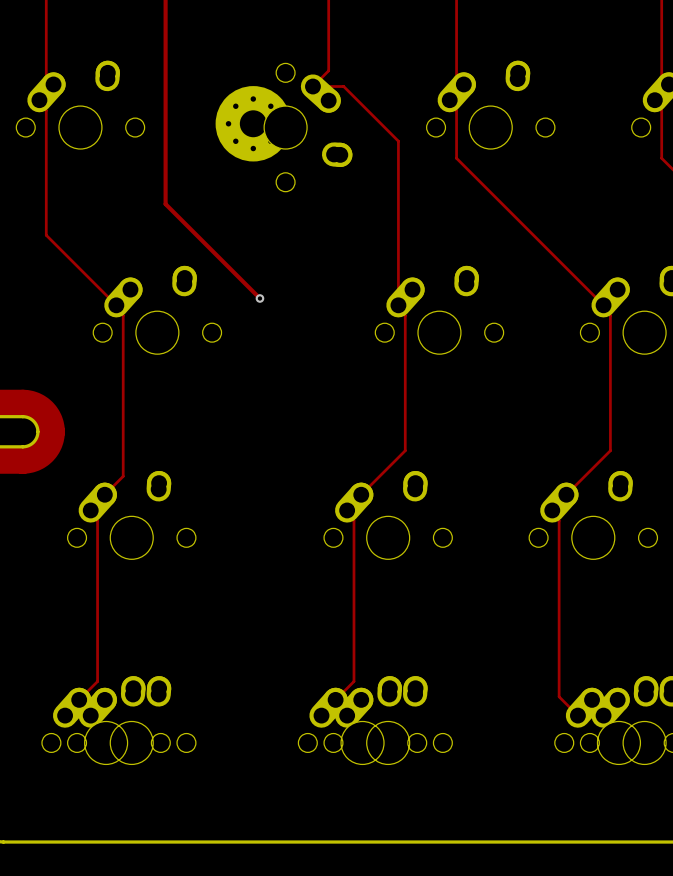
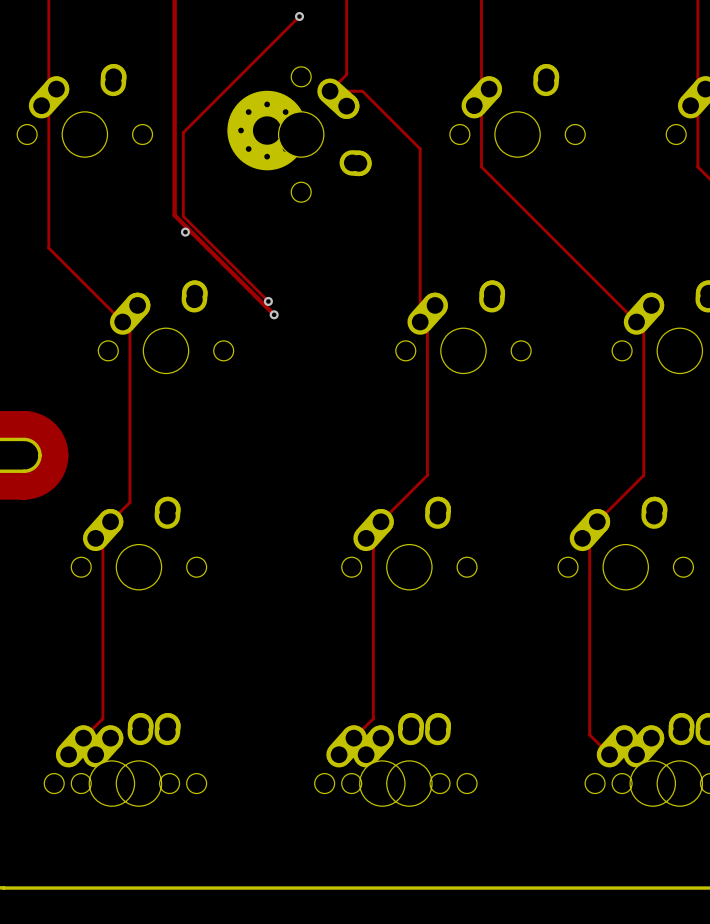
track: none -> (299, 16) (183, 132) (183, 216) (268, 301)
via: none -> (299, 16)
via: none -> (185, 232)
via: none -> (268, 301)

